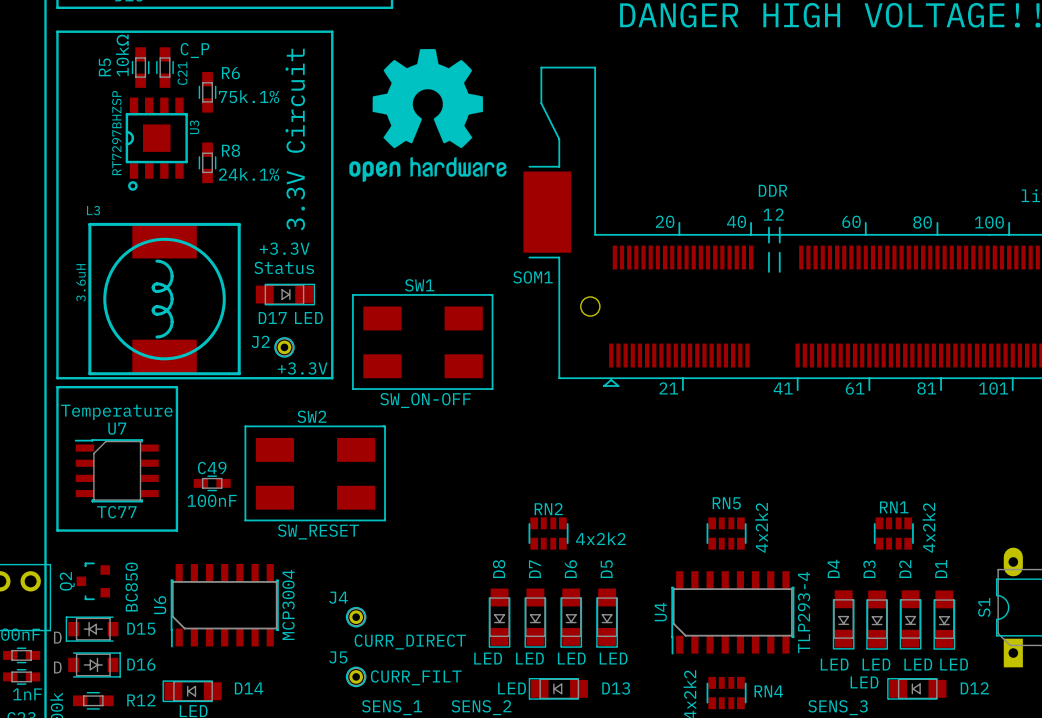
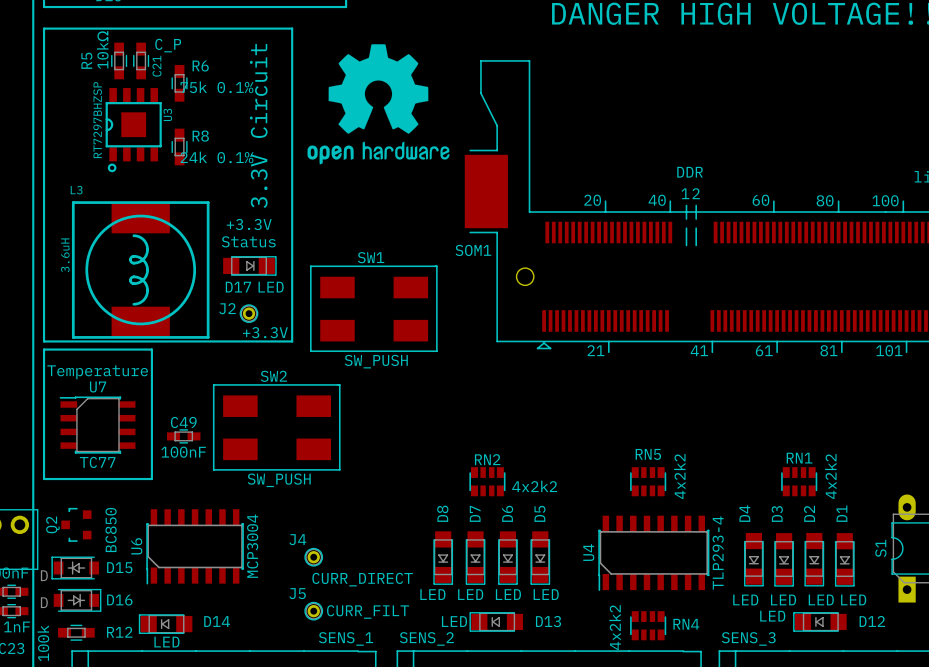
R6 value: 75k.1% (249, 96) -> 75k 0.1% (217, 87)
R8 value: 24k.1% (249, 174) -> 24k 0.1% (217, 157)
SW1 value: SW_ON-OFF (425, 400) -> SW_PUSH (376, 361)
SW2 value: SW_RESET (318, 531) -> SW_PUSH (279, 480)

